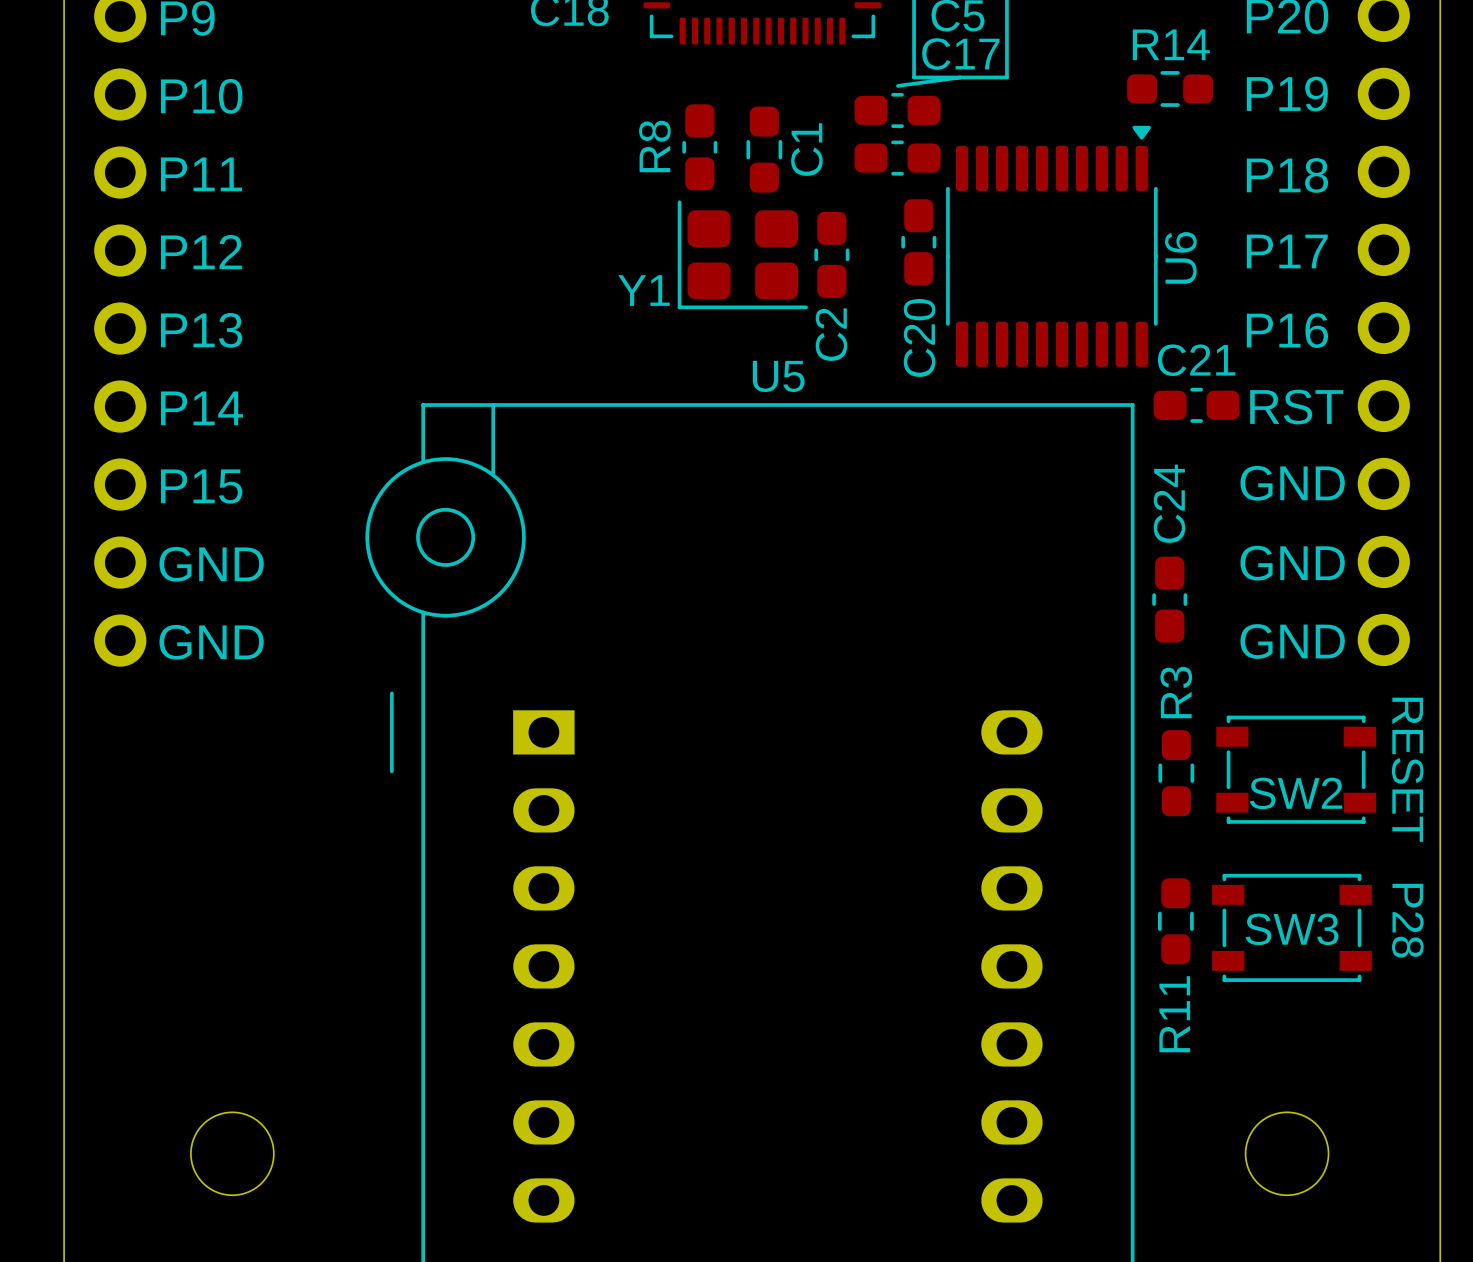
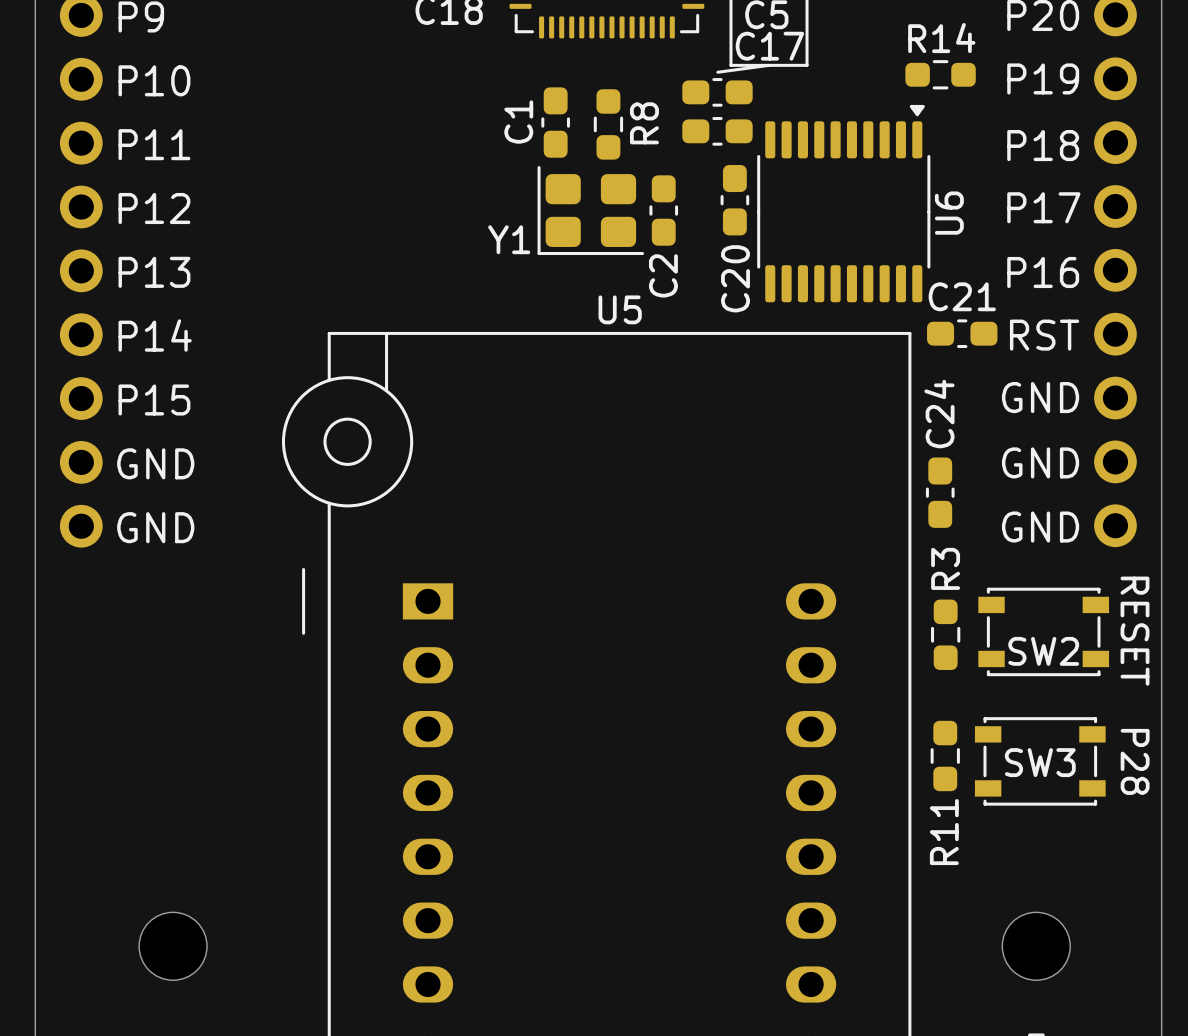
R8 name position: R8 (654, 146) -> R8 (644, 123)
C1 name position: C1 (806, 149) -> C1 (518, 122)

